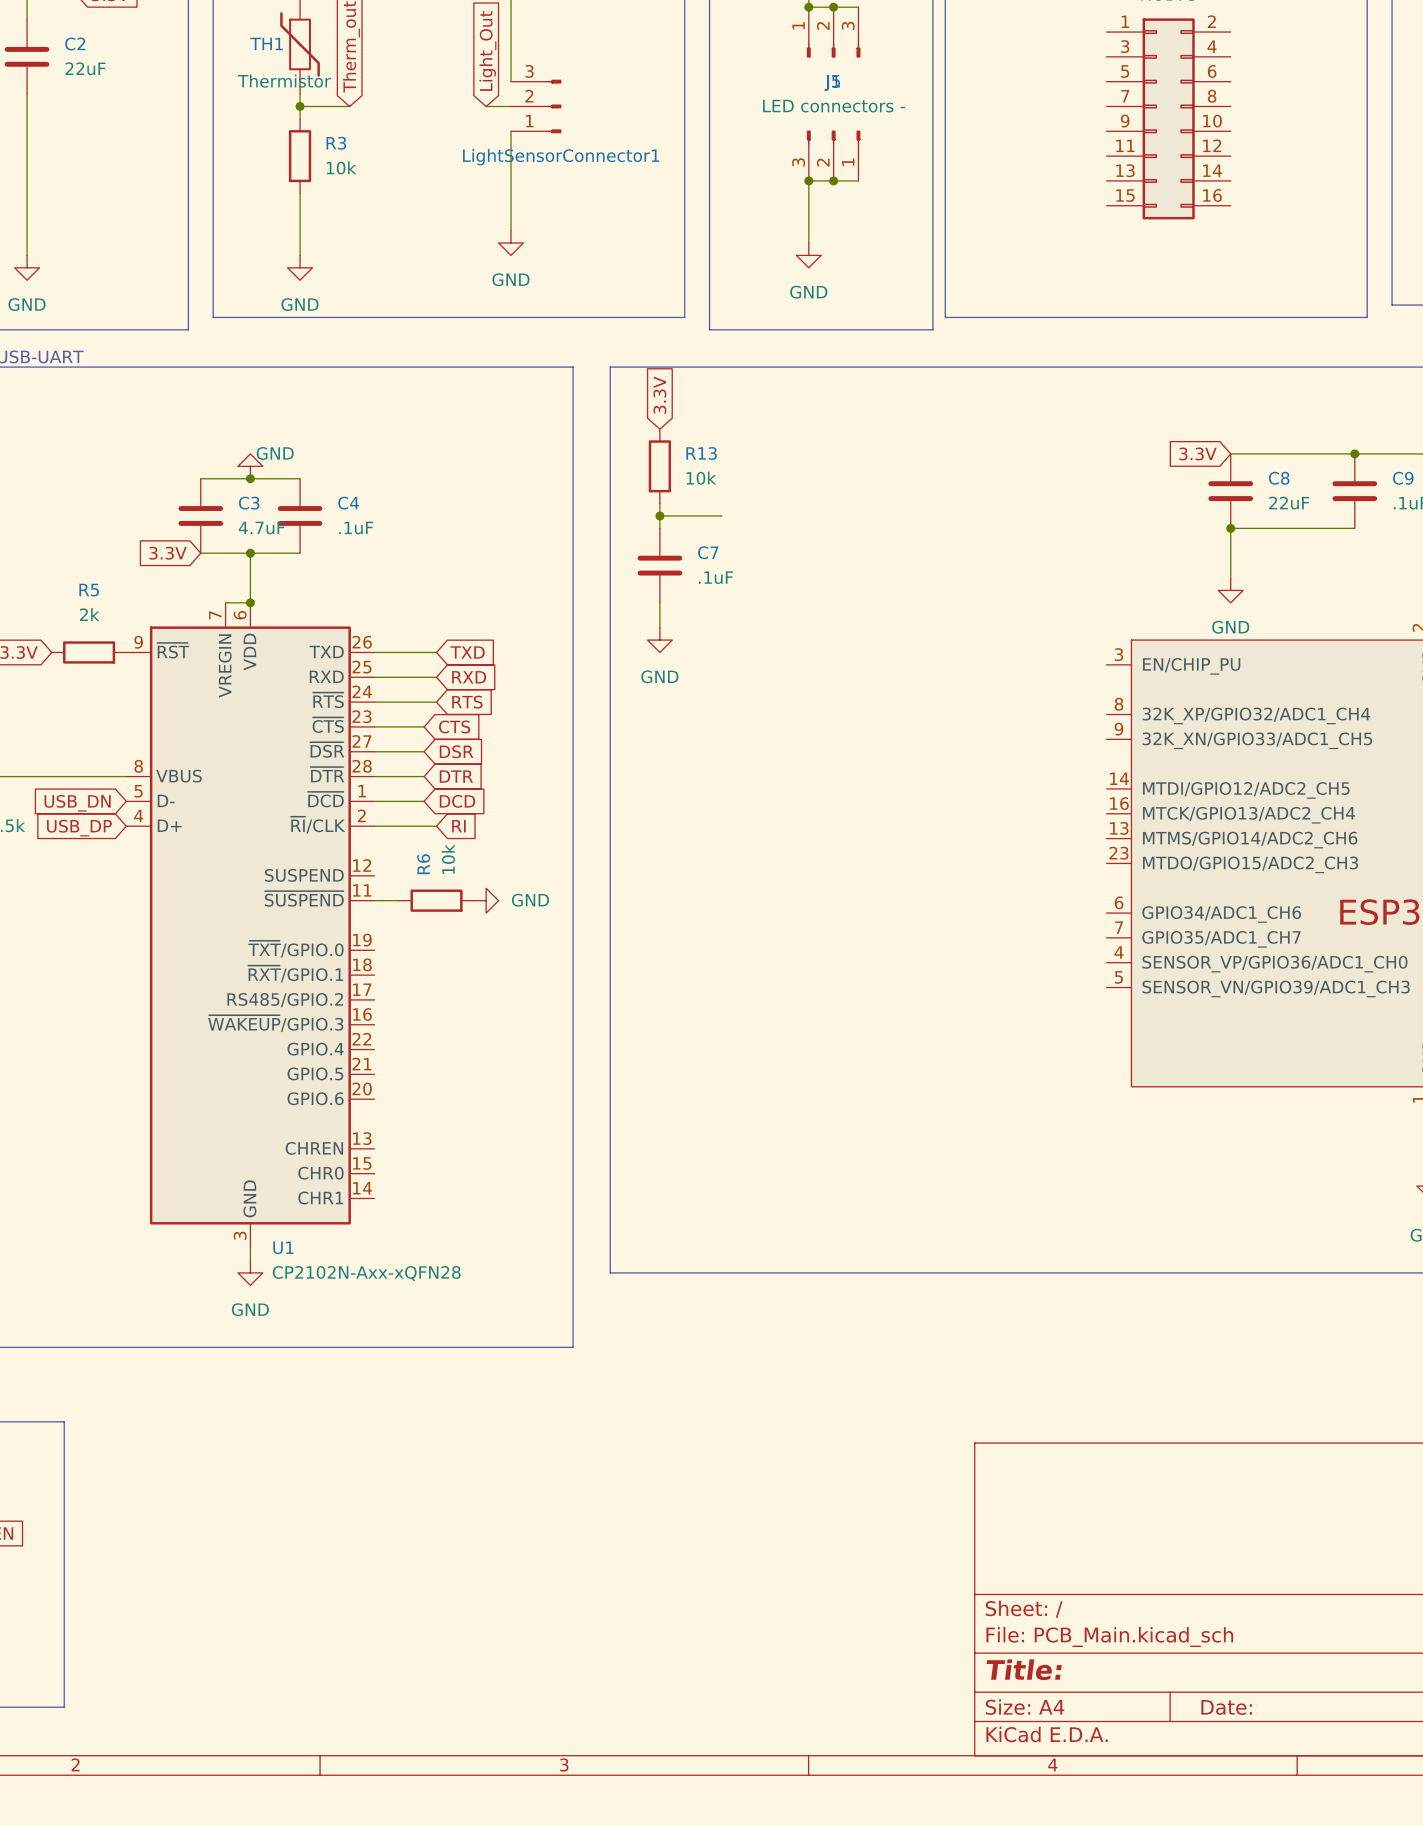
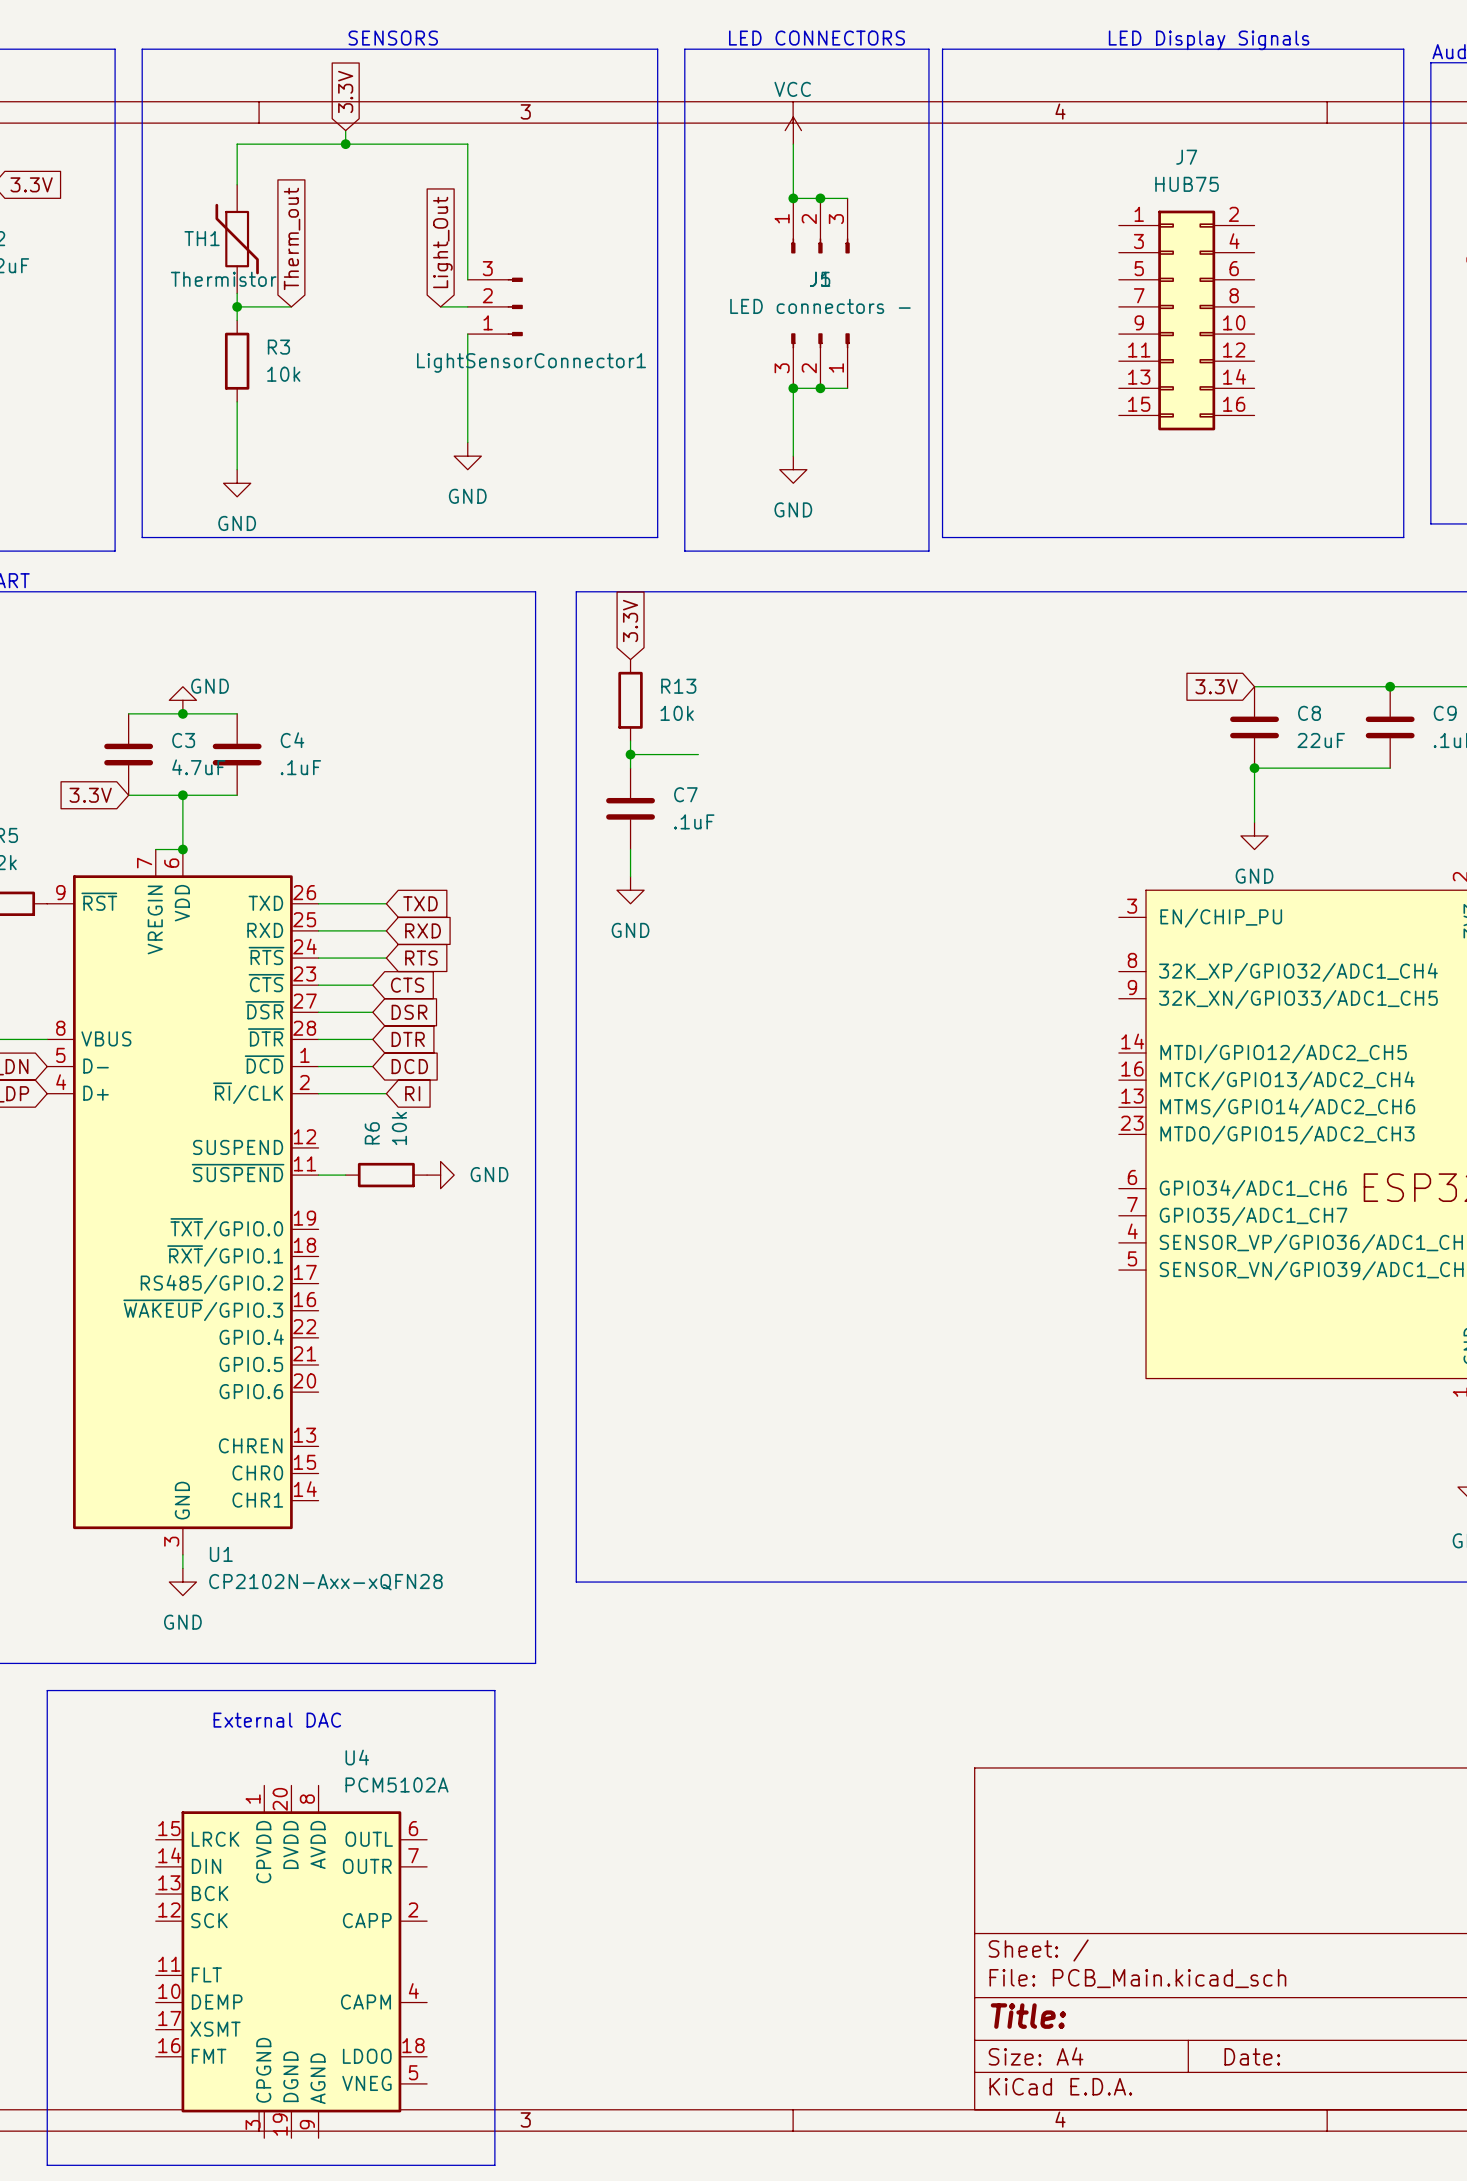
line: none -> (47, 1690) (494, 1690) (494, 2165) (47, 2165) (47, 1690)
text: none -> External DAC (277, 1720)
U4: none -> PCM5102A (291, 1961)

